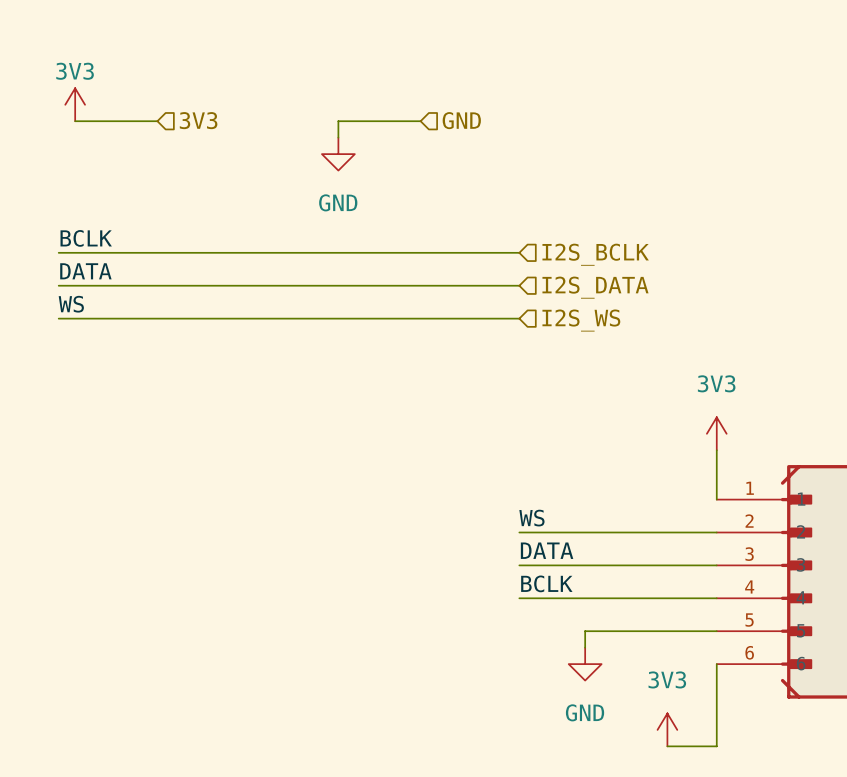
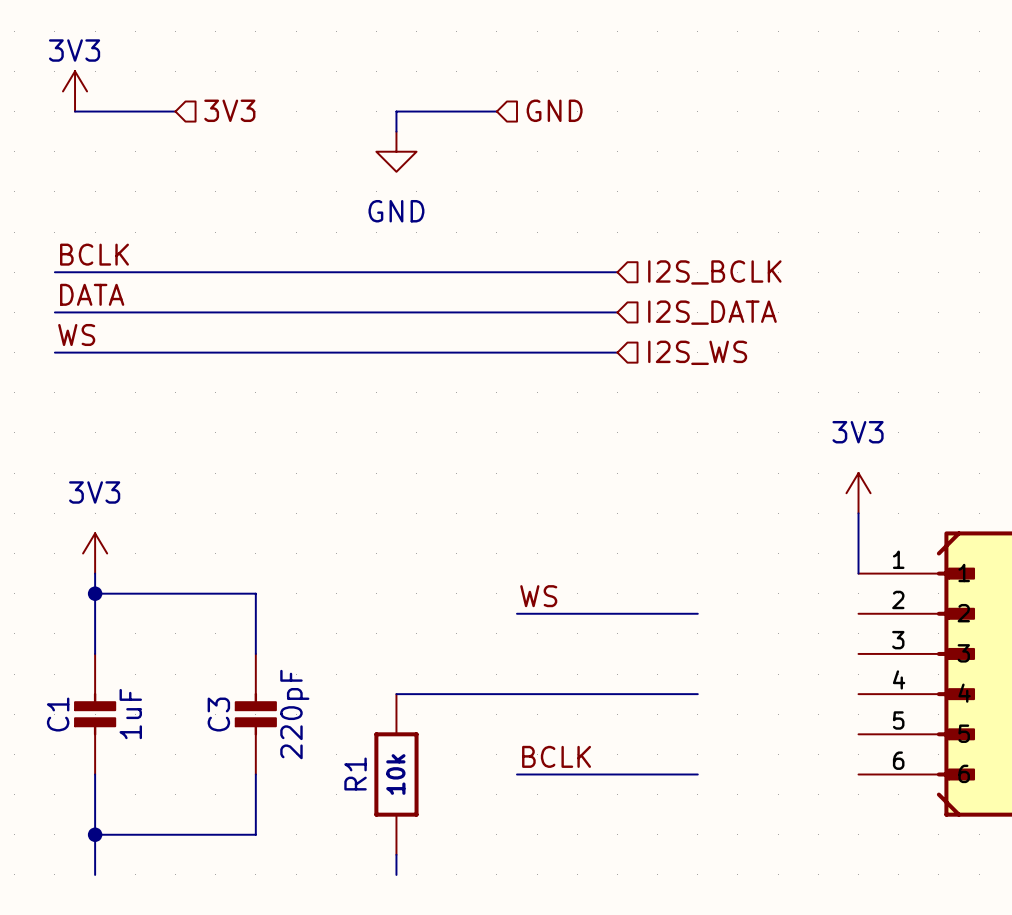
power symbol: none -> 3V3 (95, 553)
wire: none -> (95, 573) (95, 653)
wire: none -> (95, 593) (255, 593) (255, 653)
junction: none -> (95, 593)
label position: WS (531, 518) -> WS (538, 596)
wire: none -> (516, 613) (617, 613)
wire: (585, 532) (716, 532) -> none
label: DATA (547, 550) -> none
wire: (519, 565) (716, 565) -> none
label position: BCLK (546, 583) -> BCLK (556, 756)
wire: none -> (396, 694) (617, 694)
wire: (585, 598) (716, 598) -> none
C1: none -> 1uF (95, 714)
C3: none -> 220pF (255, 714)
wire: (716, 631) (585, 631) (585, 647) -> none
wire: none -> (95, 774) (95, 874)
wire: none -> (255, 774) (255, 834) (95, 834)
R1: none -> 10k (396, 774)
wire: none -> (516, 774) (697, 774)
power symbol: GND (585, 664) -> none
wire: (716, 664) (716, 746) (667, 746) -> none
junction: none -> (95, 834)
wire: none -> (396, 854) (396, 874)
power symbol: 3V3 (667, 729) -> none

